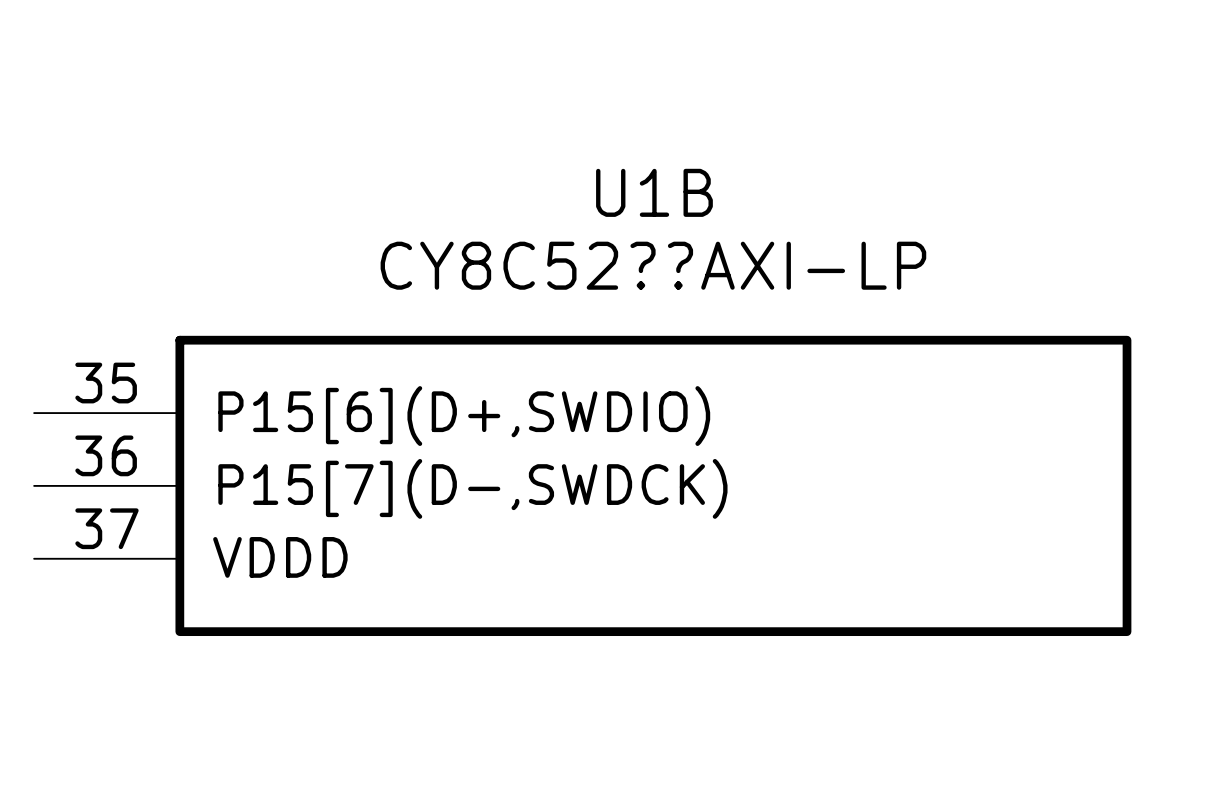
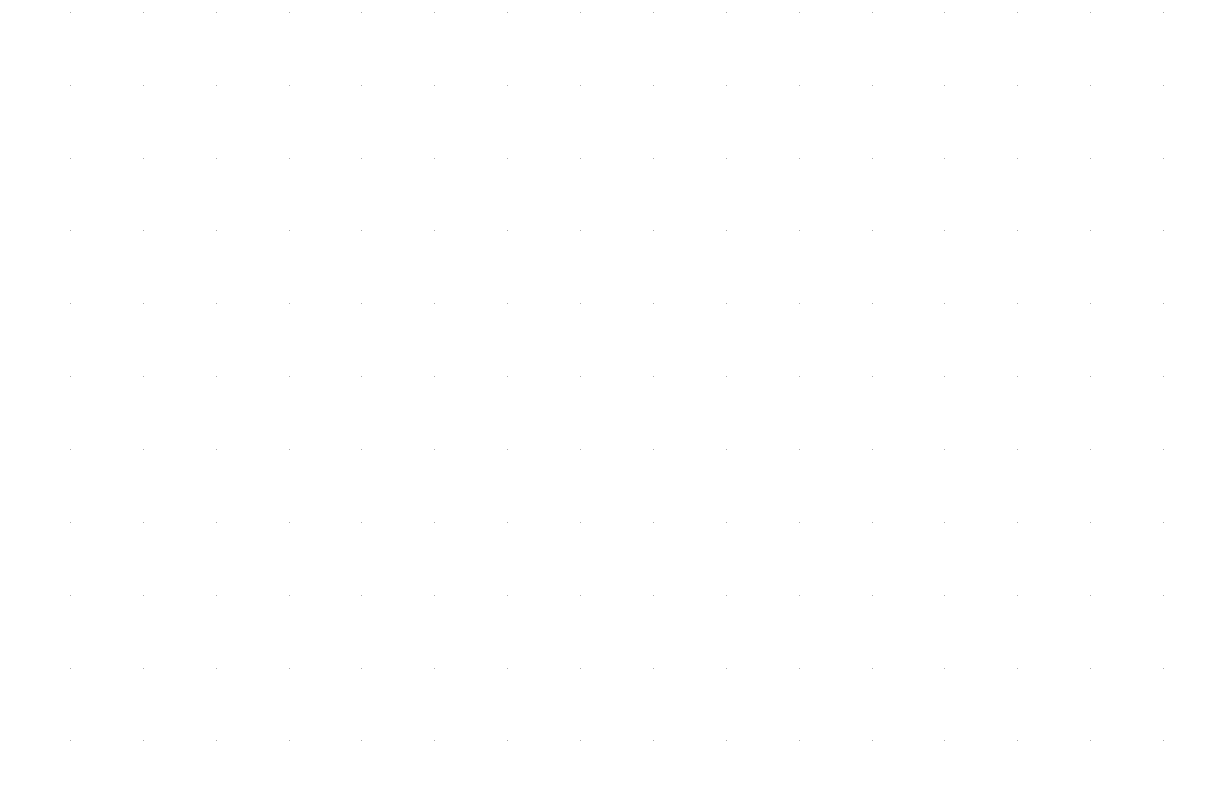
U1B: CY8C52??AXI-LP (582, 485) -> none

